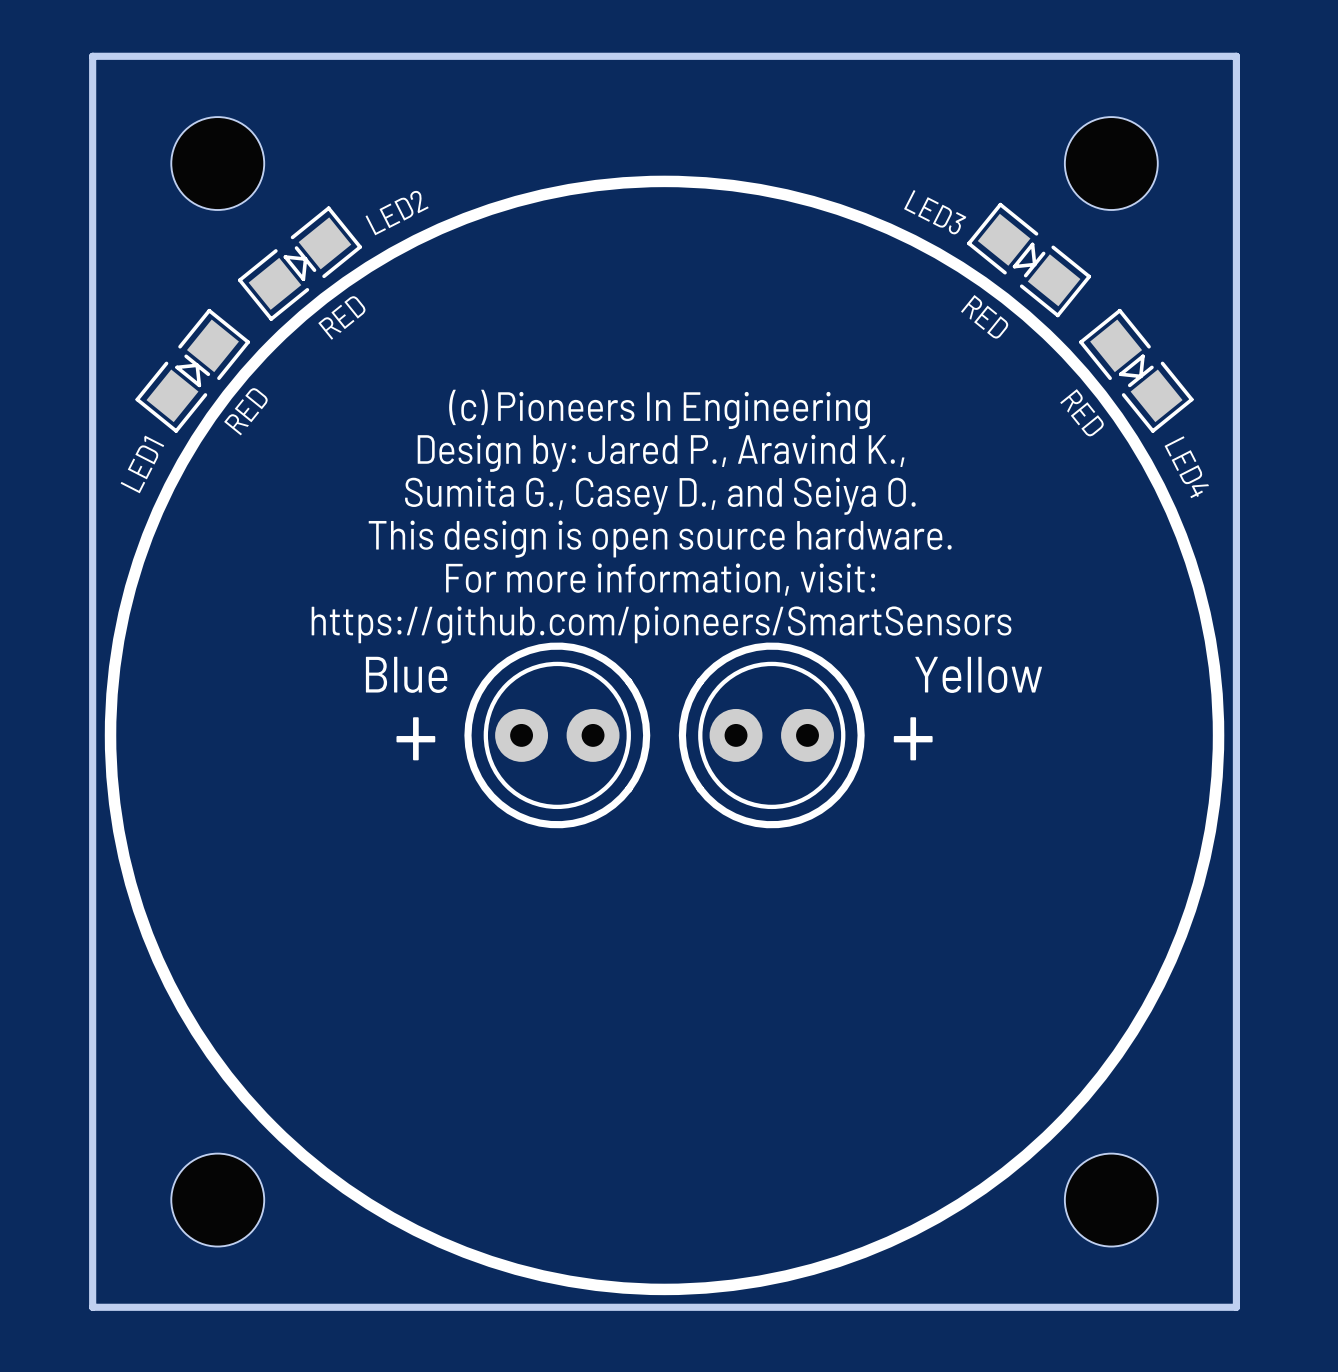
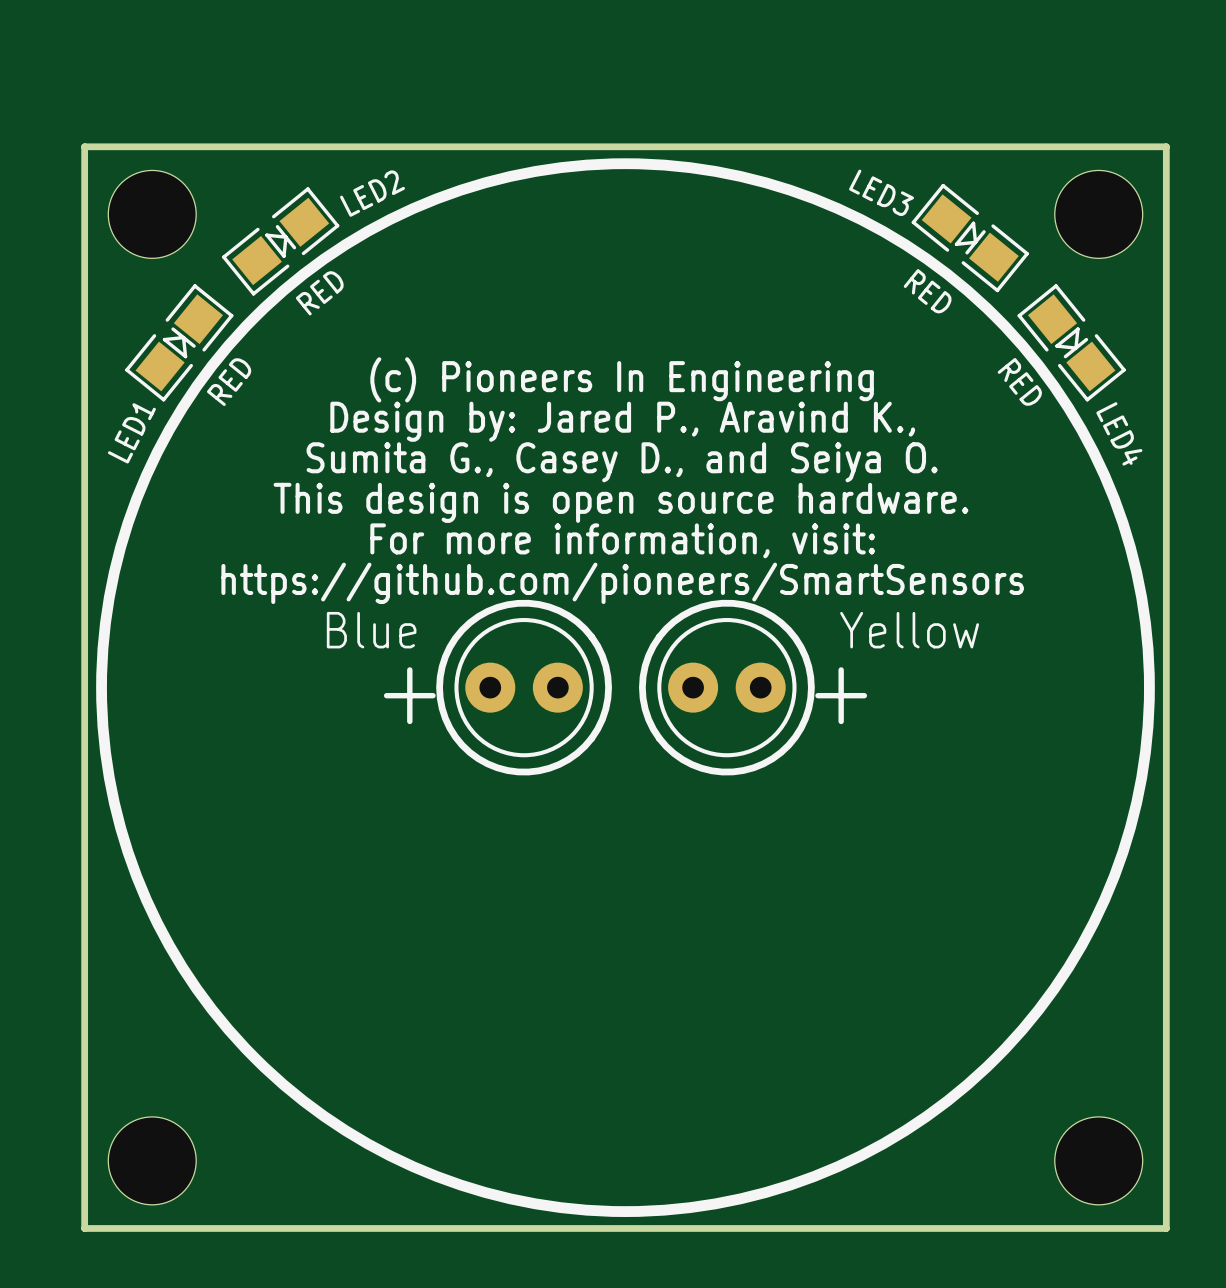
part position: (217, 163) -> (152, 214)
part position: (1111, 163) -> (1098, 214)
board edge: (1236, 163) (1236, 56) (92, 56) (92, 163) -> (1166, 146) (84, 146)
part position: (217, 1200) -> (152, 1160)
part position: (1111, 1200) -> (1098, 1160)

